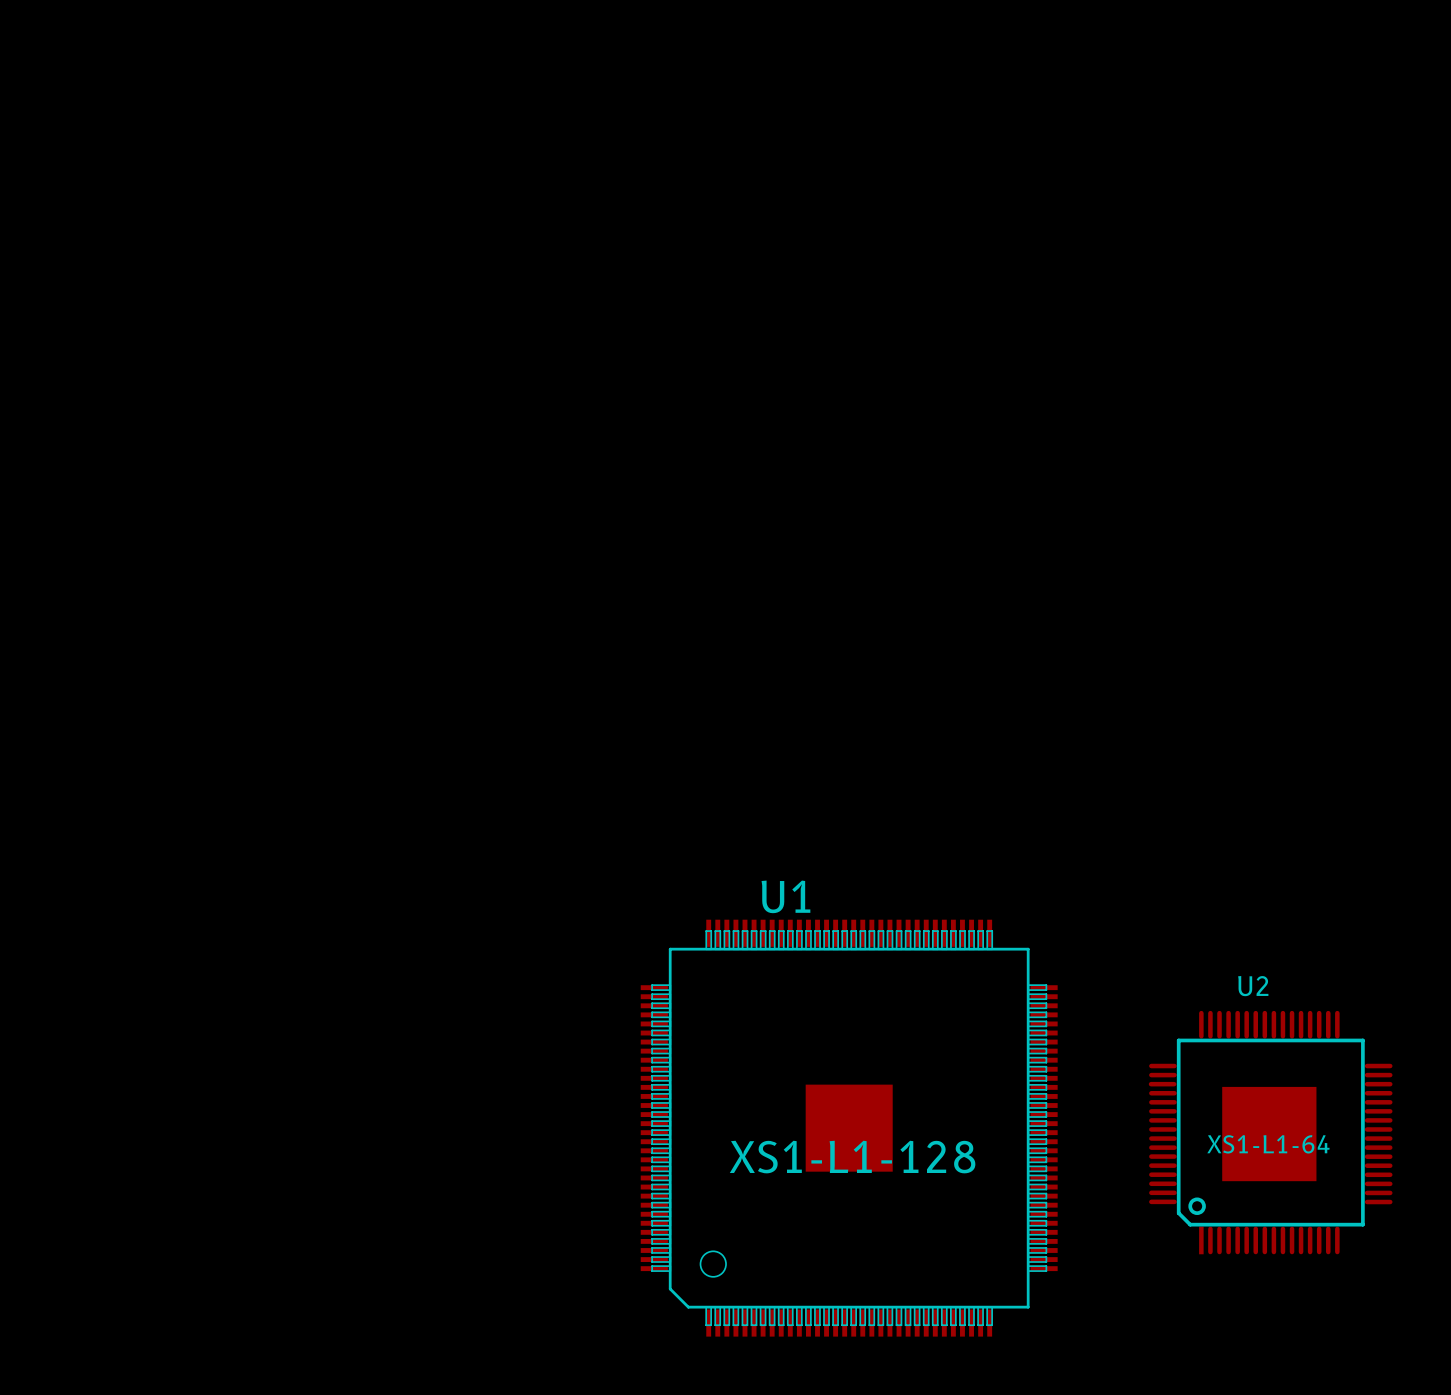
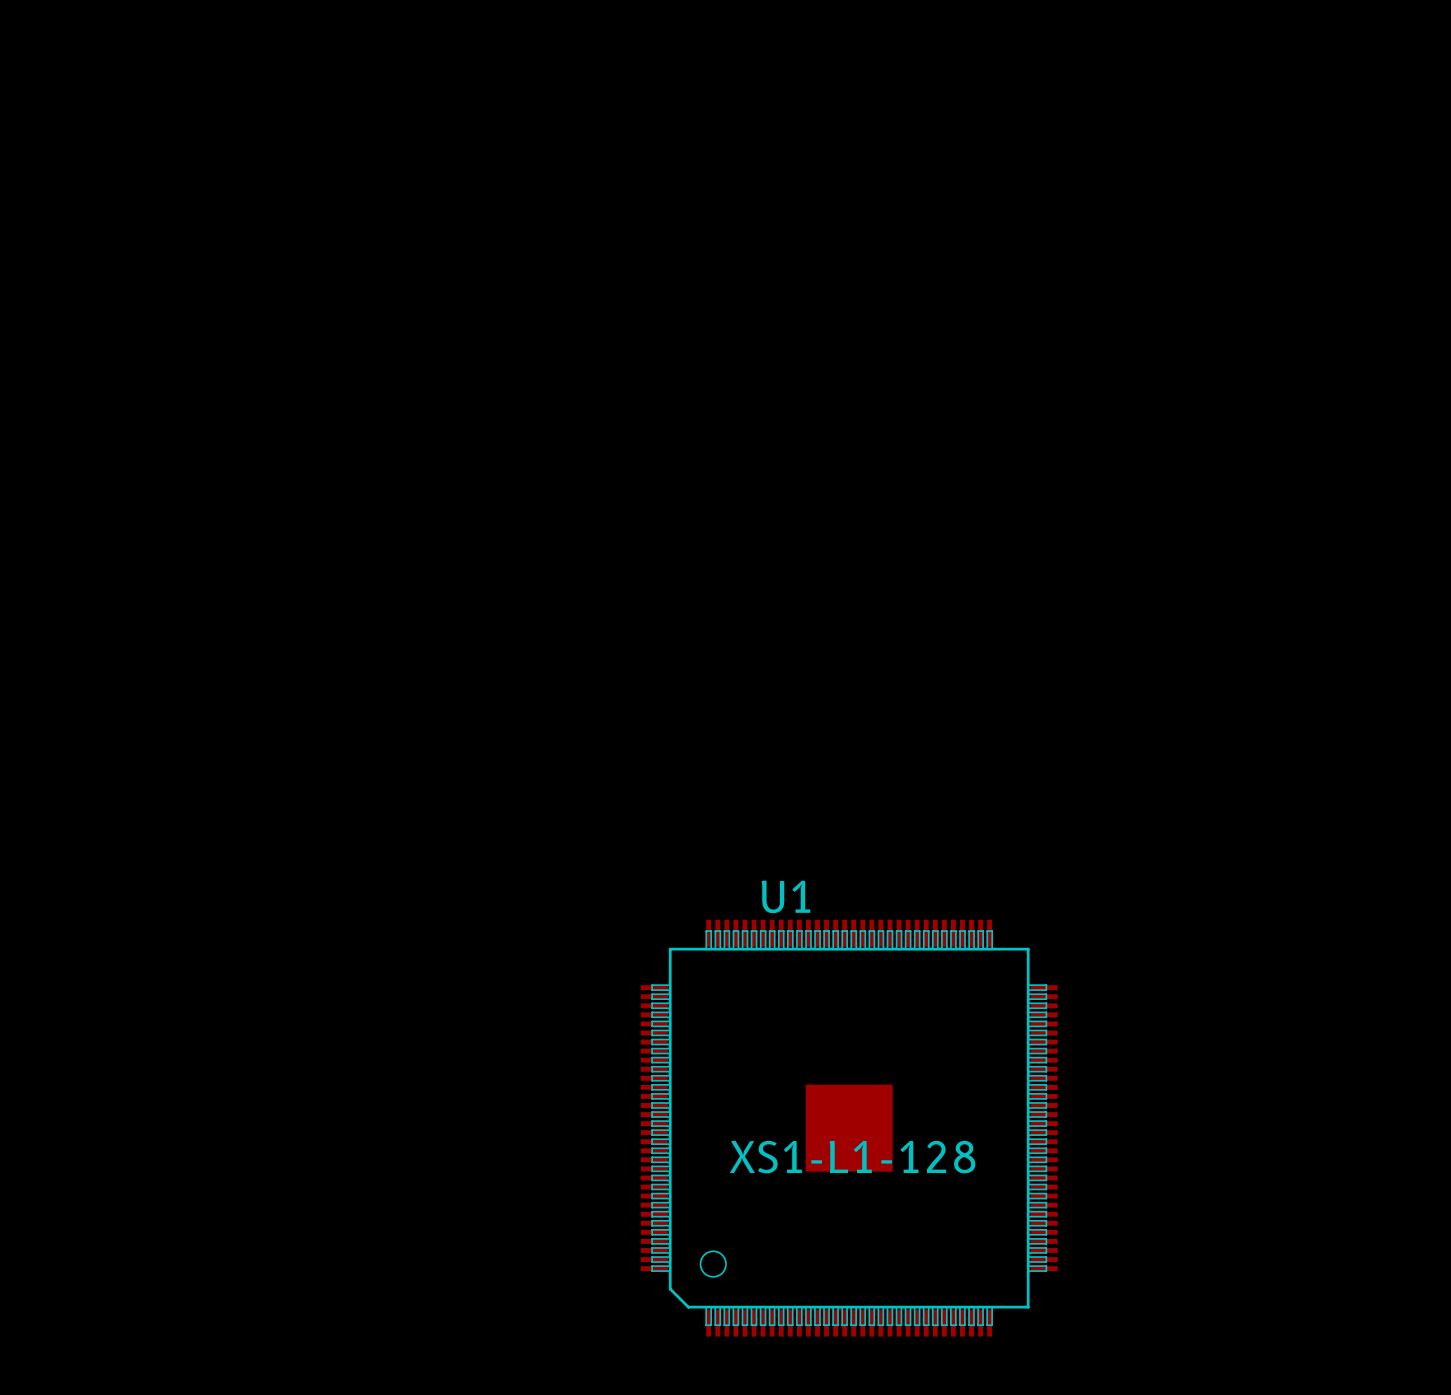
U2: XS1-L1-64 (1270, 1132) -> none

